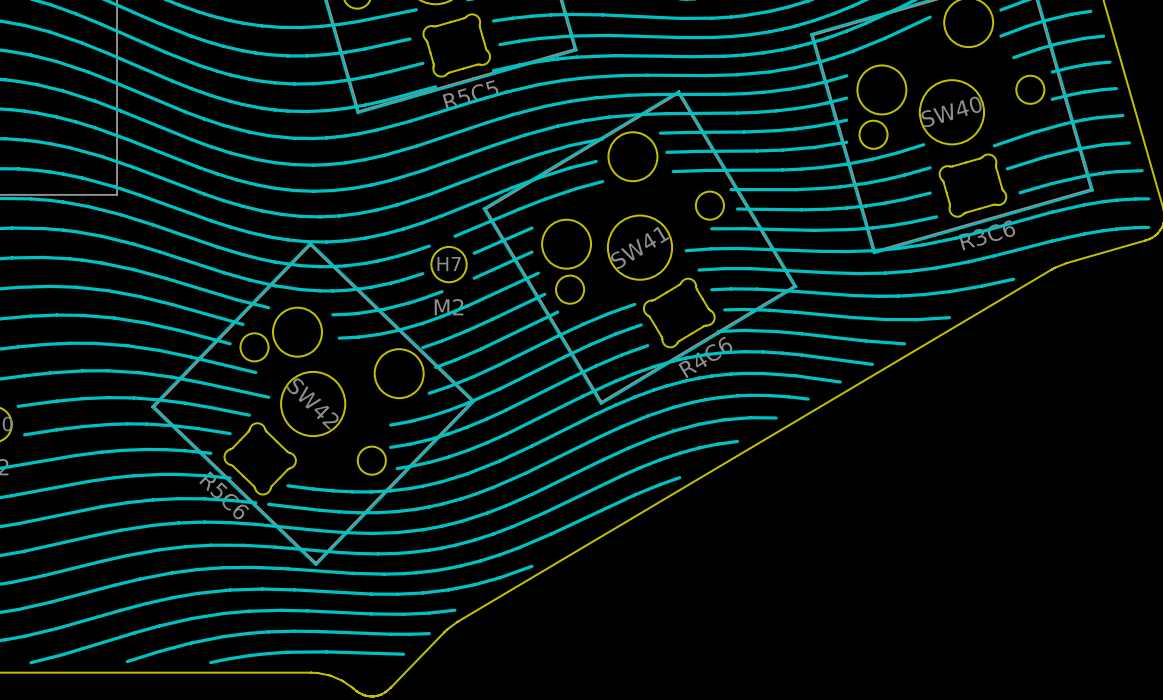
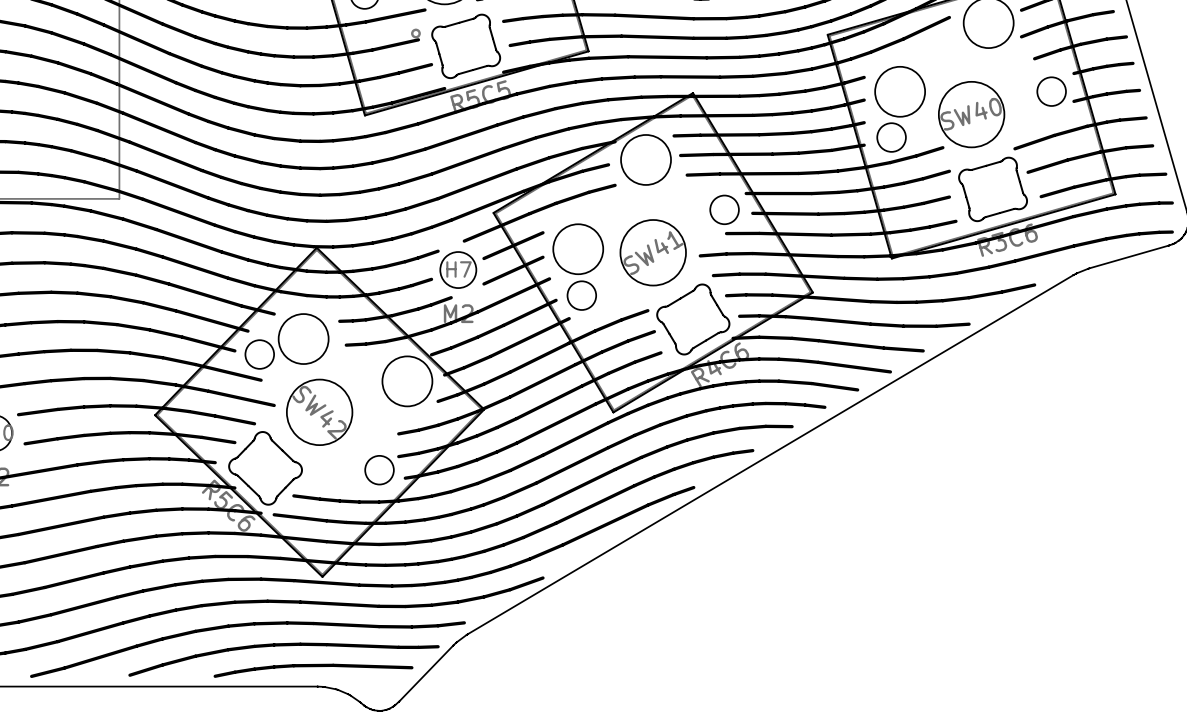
via: none -> (415, 33)

